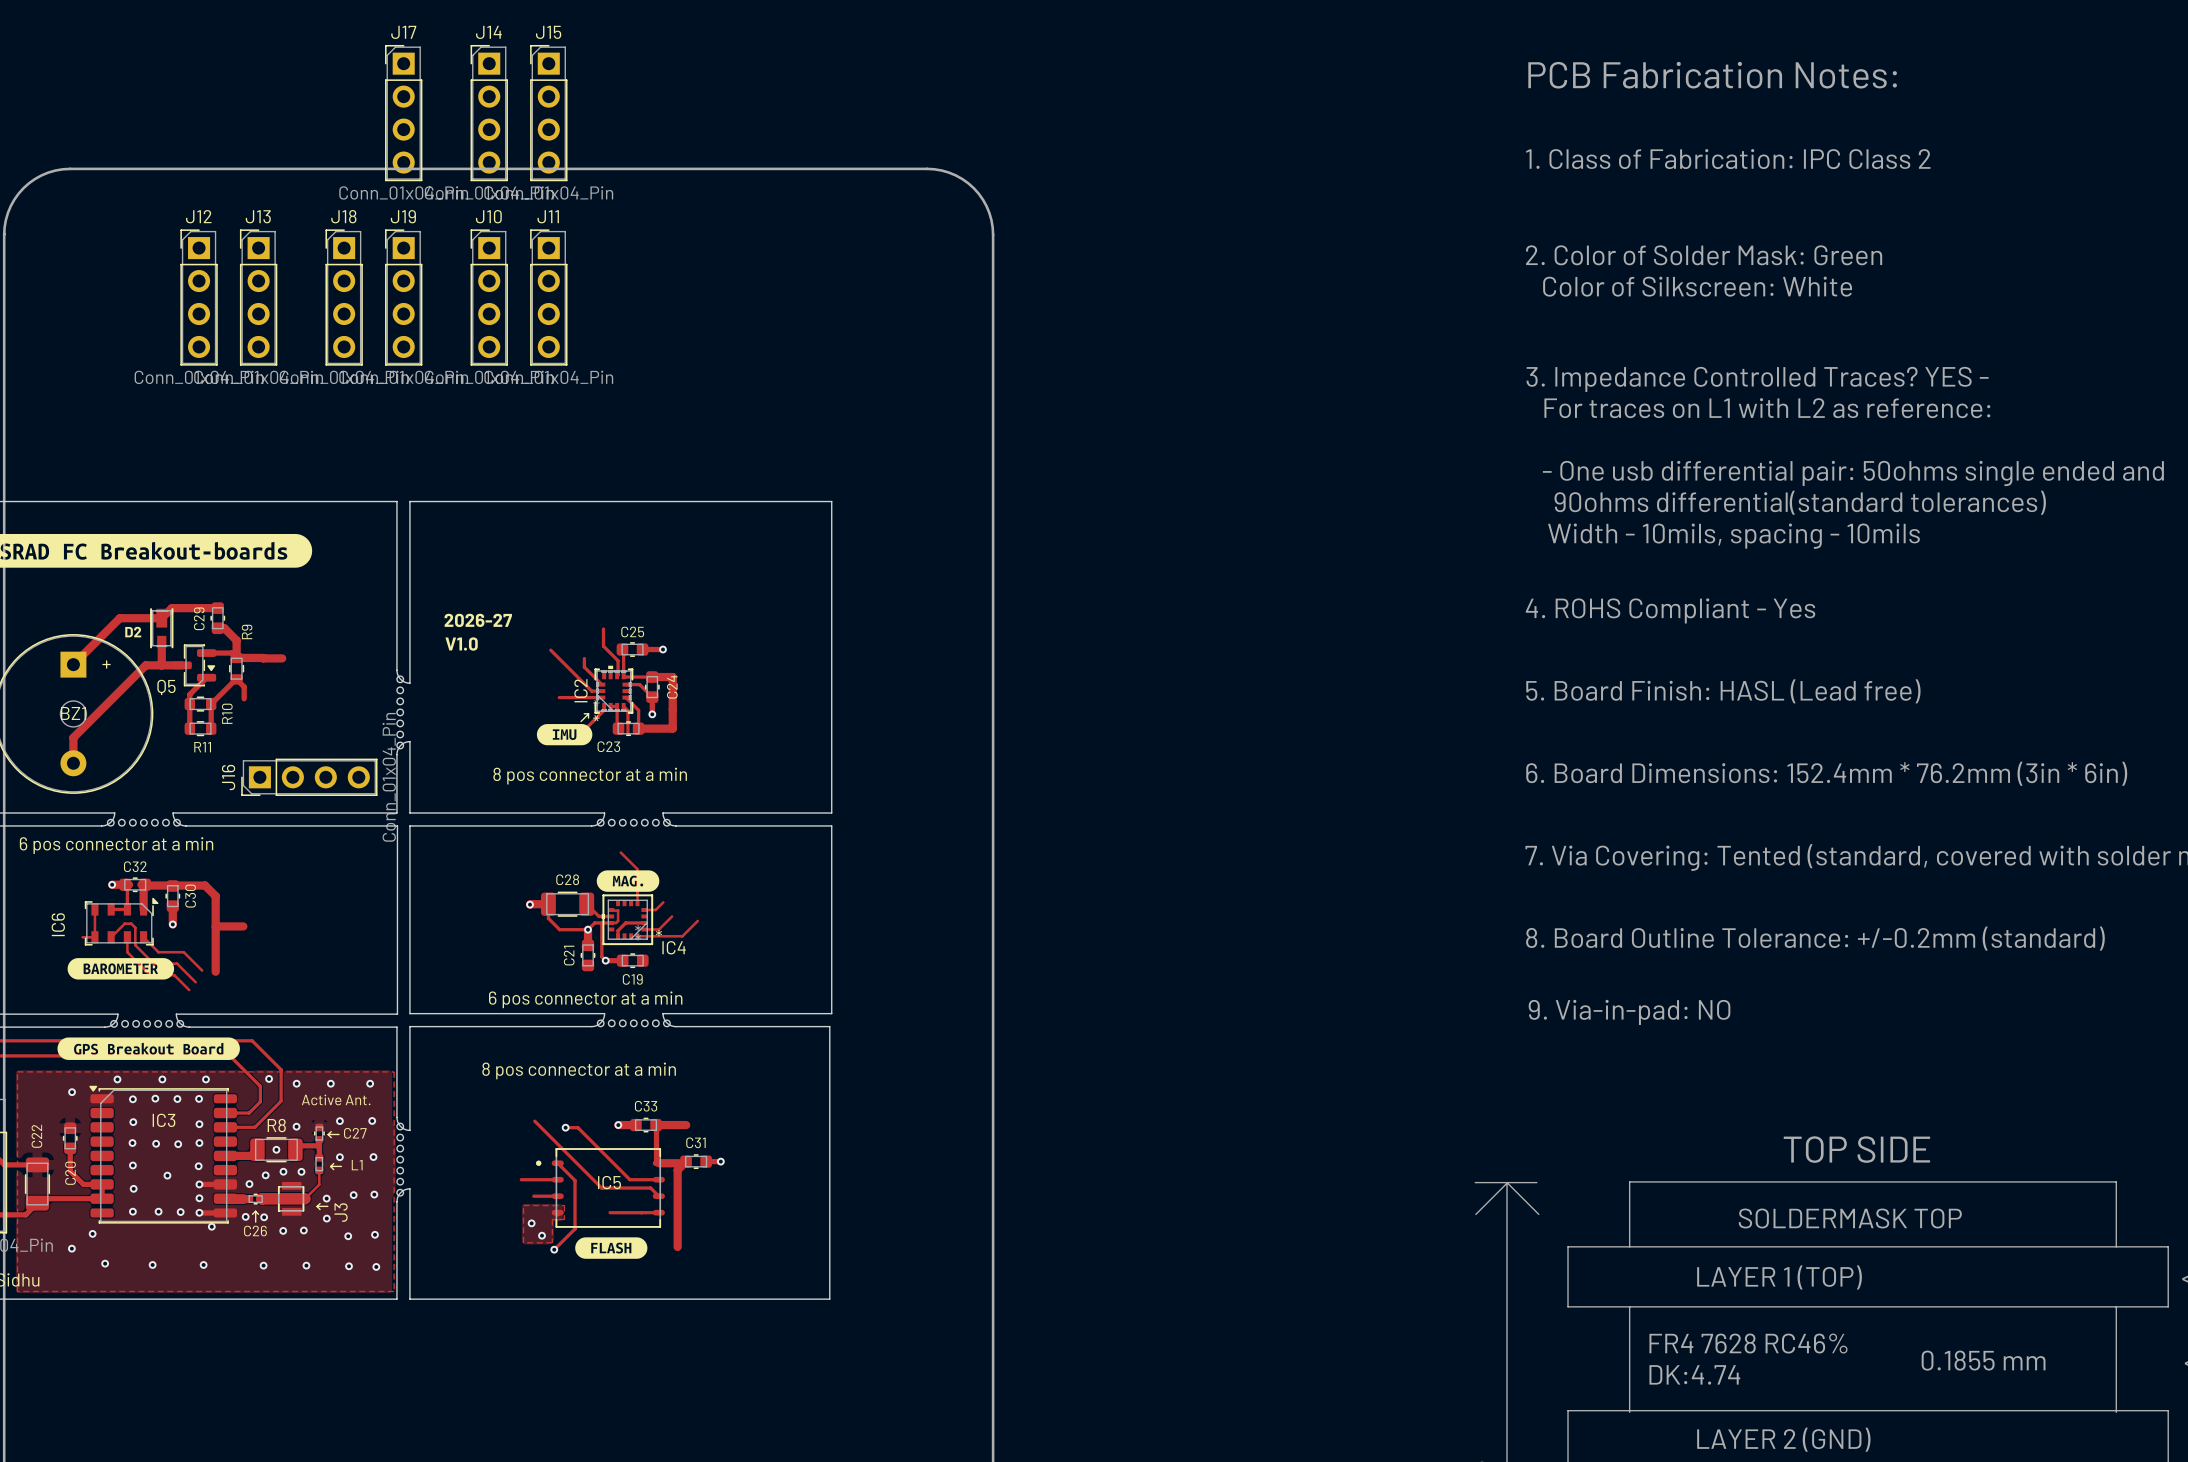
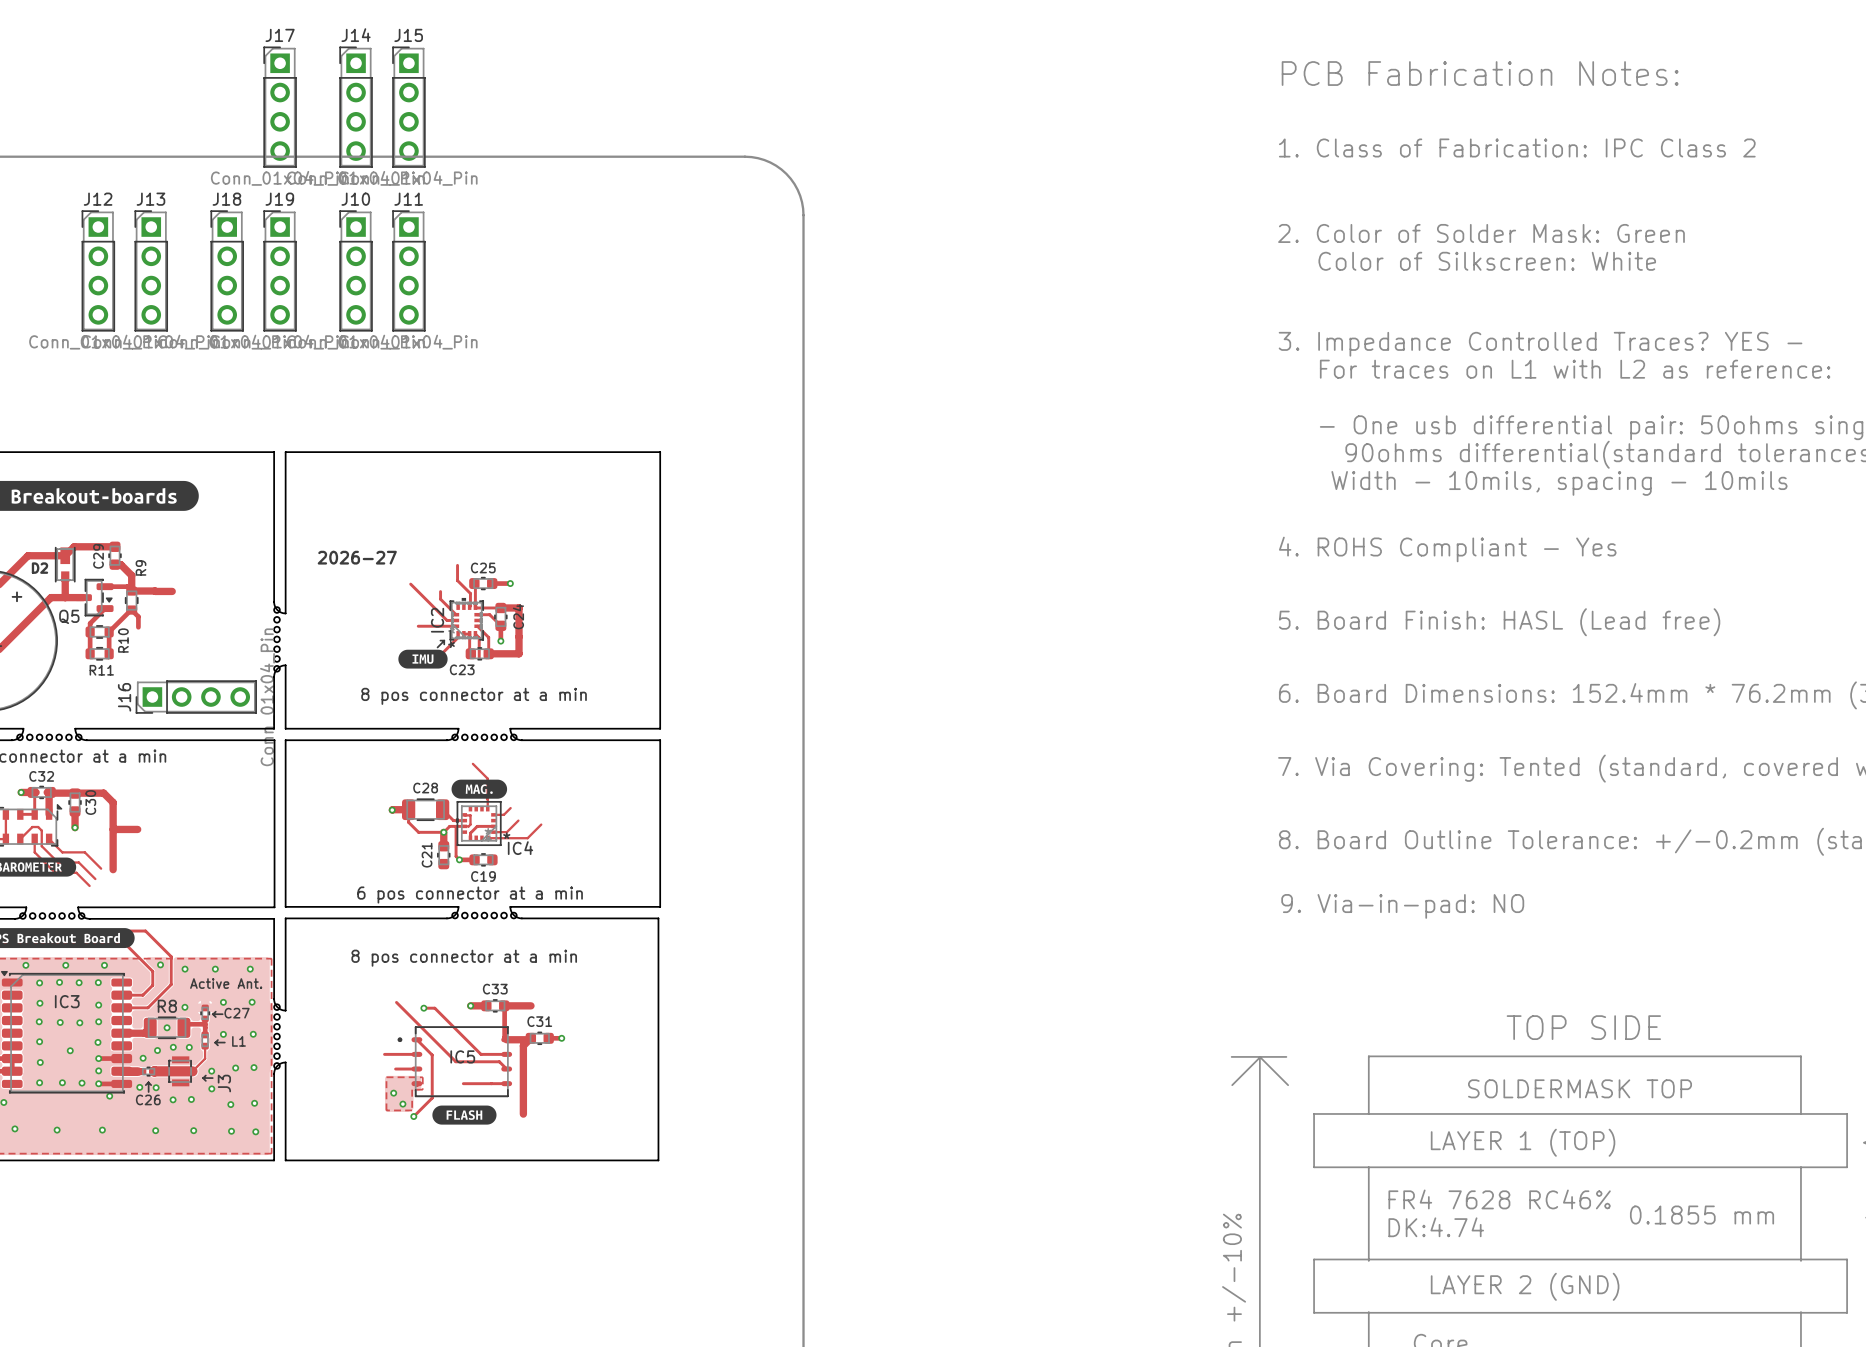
text: V1.0 (461, 644) -> none

